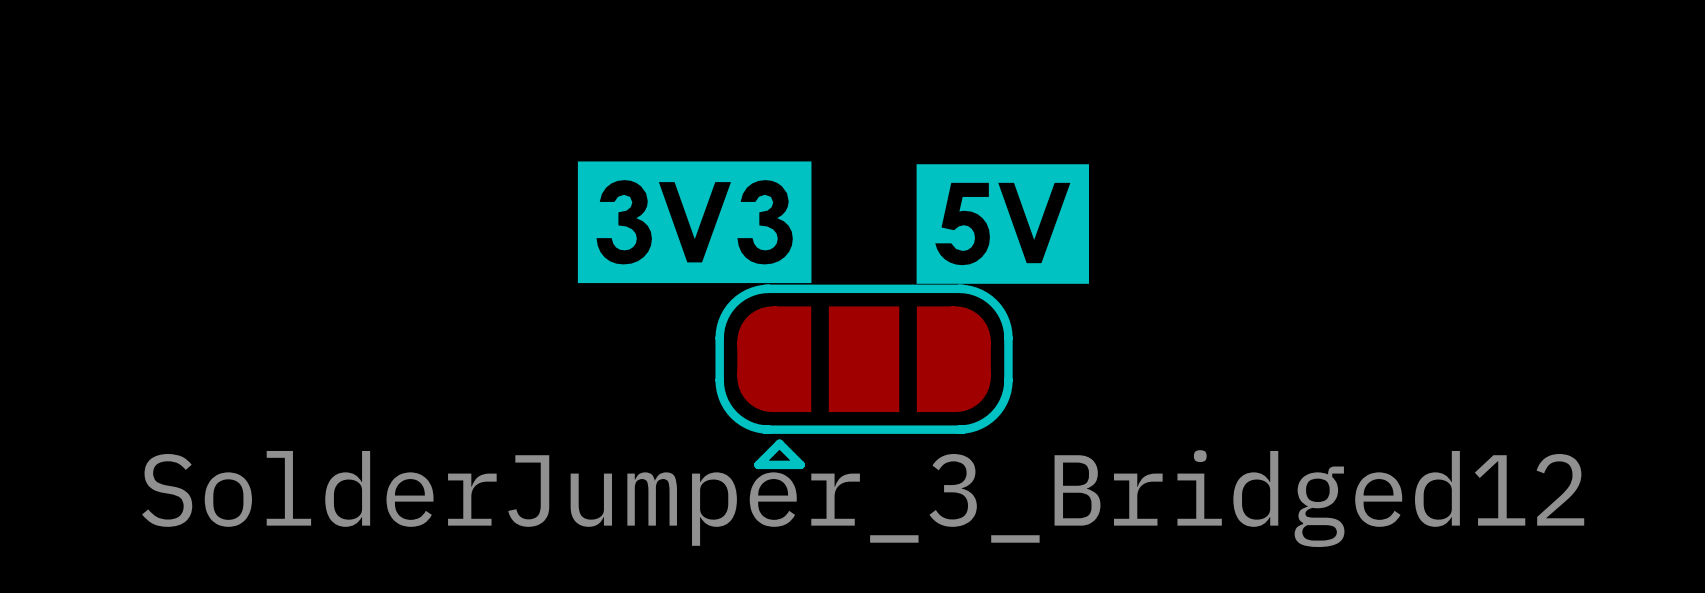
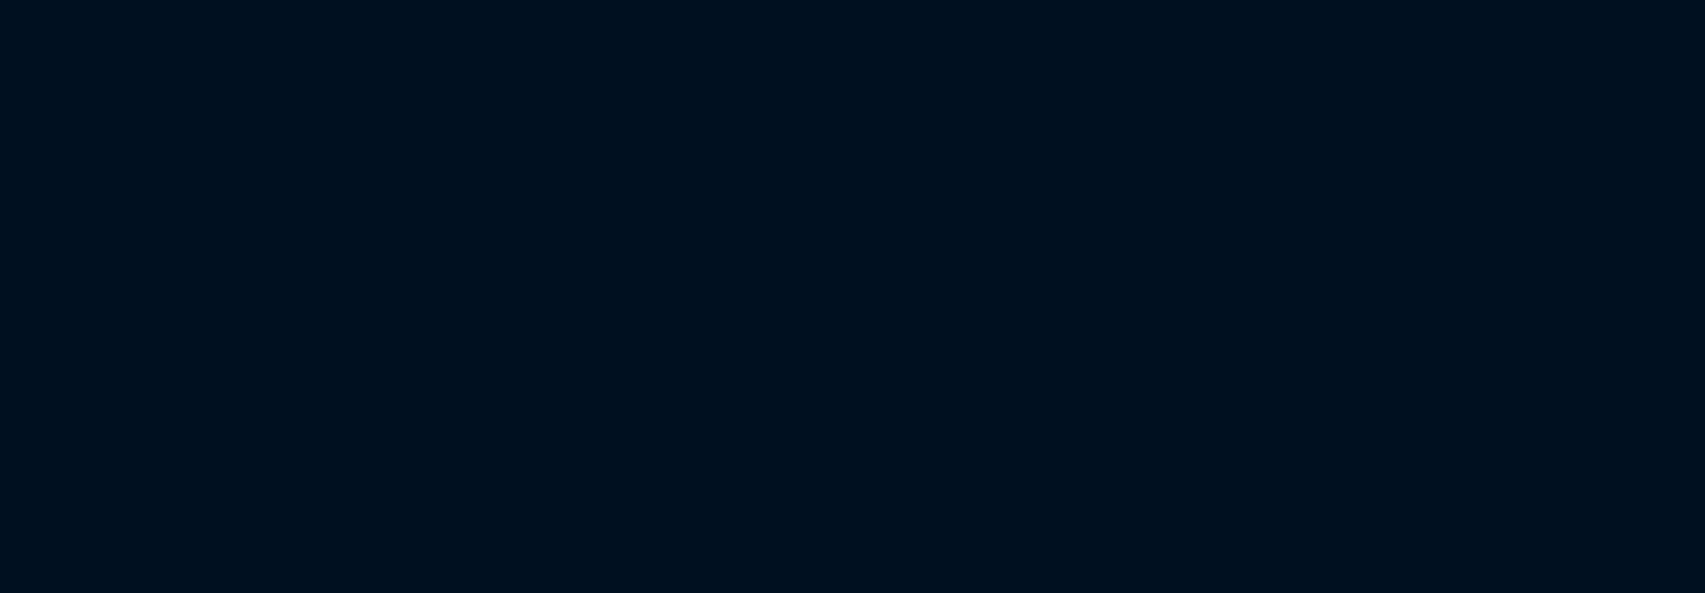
drawing: [577, 161, 812, 284] -> none
drawing: [916, 164, 1090, 284] -> none
part: SolderJumper_3_Bridged12 (864, 376) -> none

